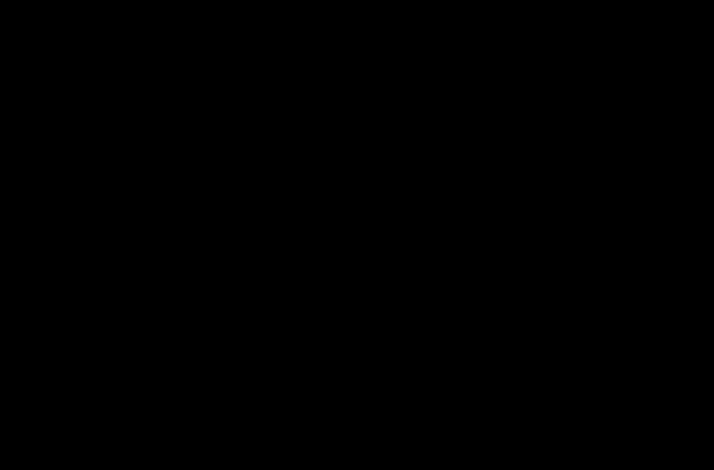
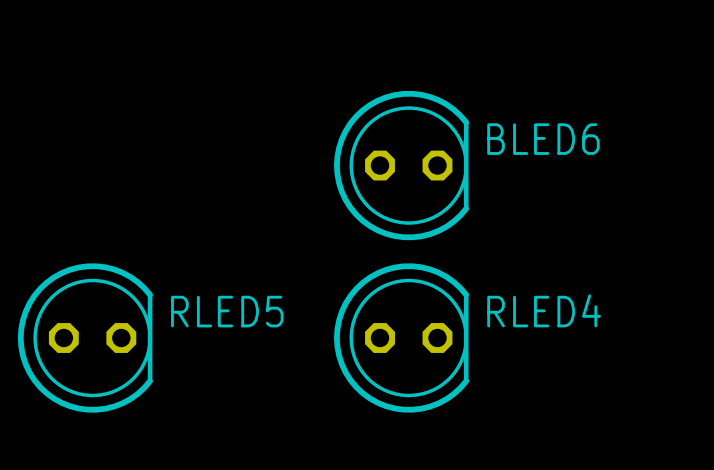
BLED6: none -> (401, 165)
RLED5: none -> (85, 338)
RLED4: none -> (401, 338)

